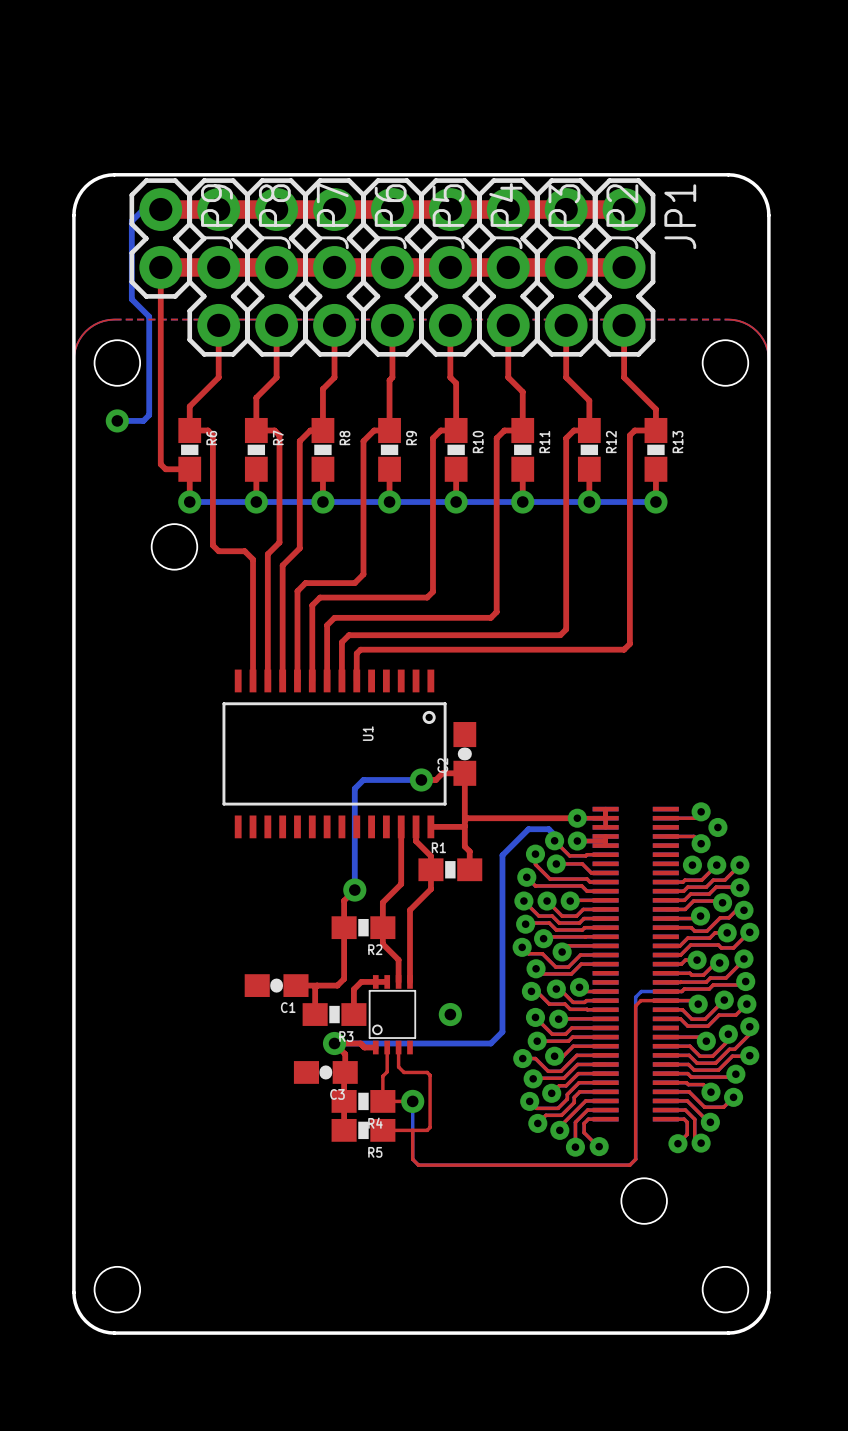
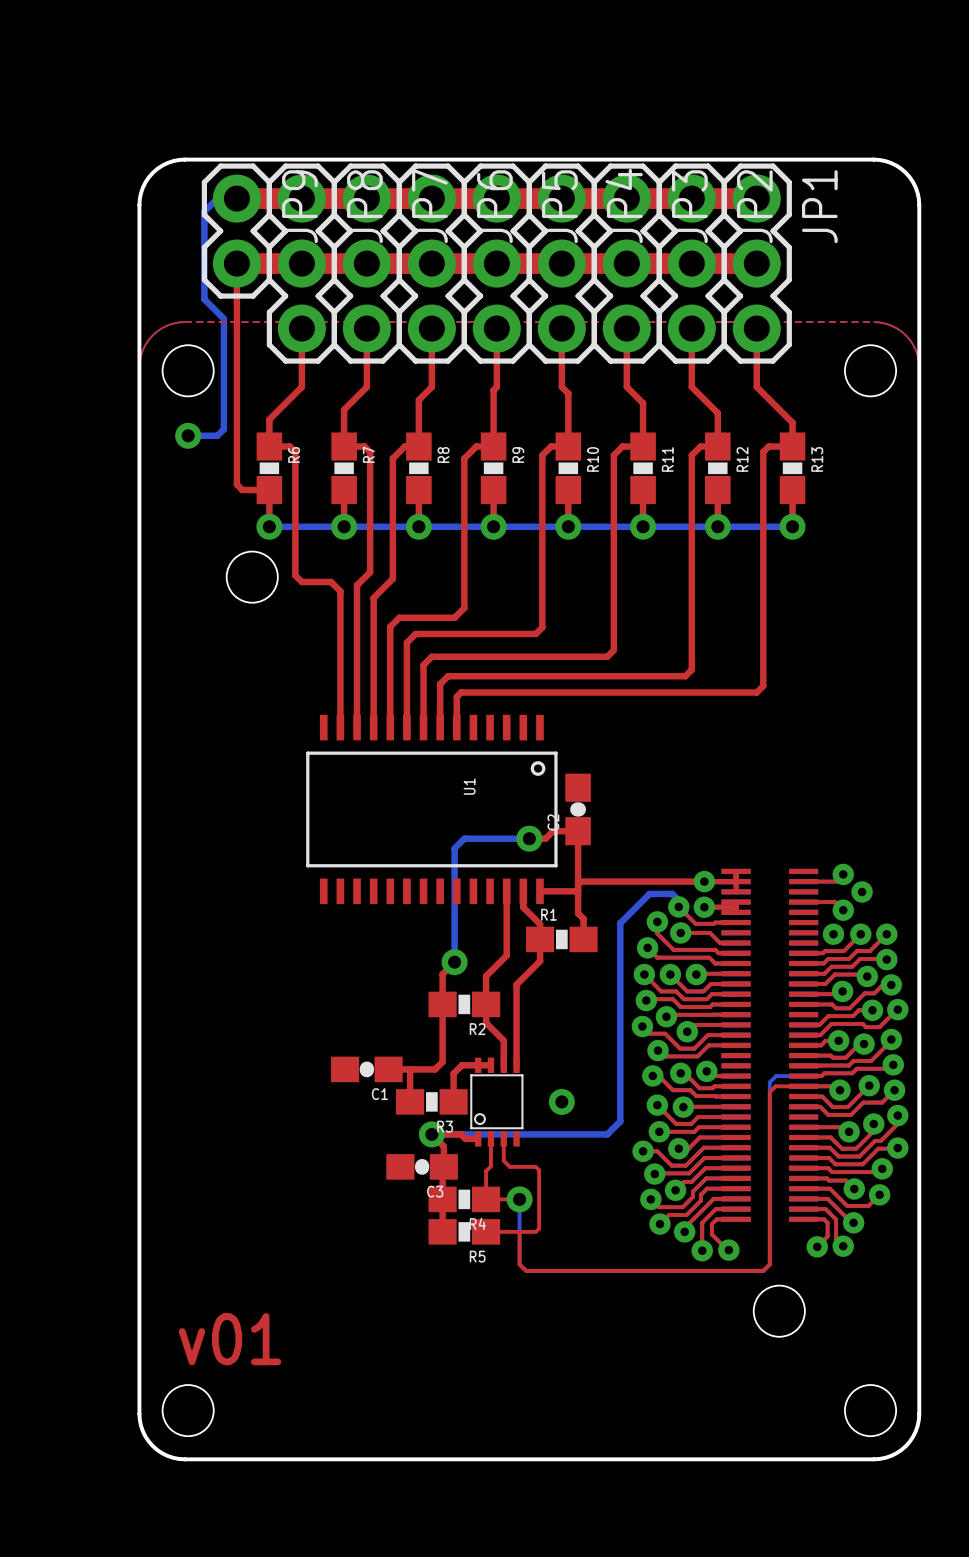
text: none -> v01 (230, 1339)

